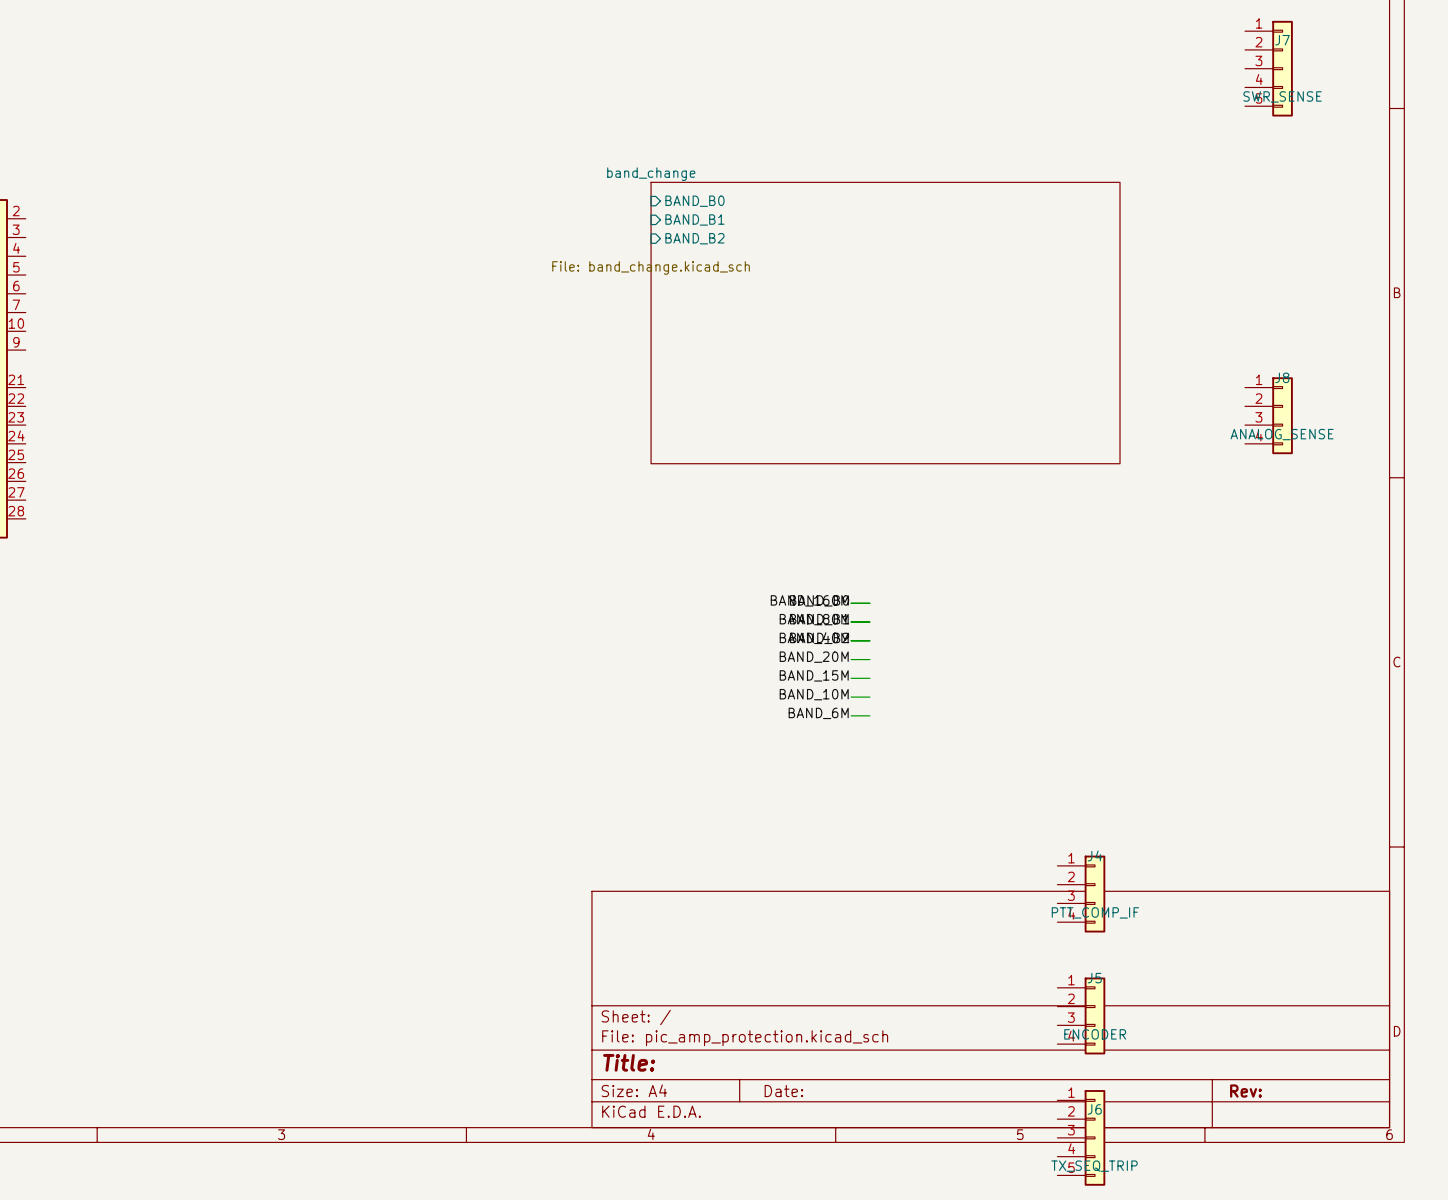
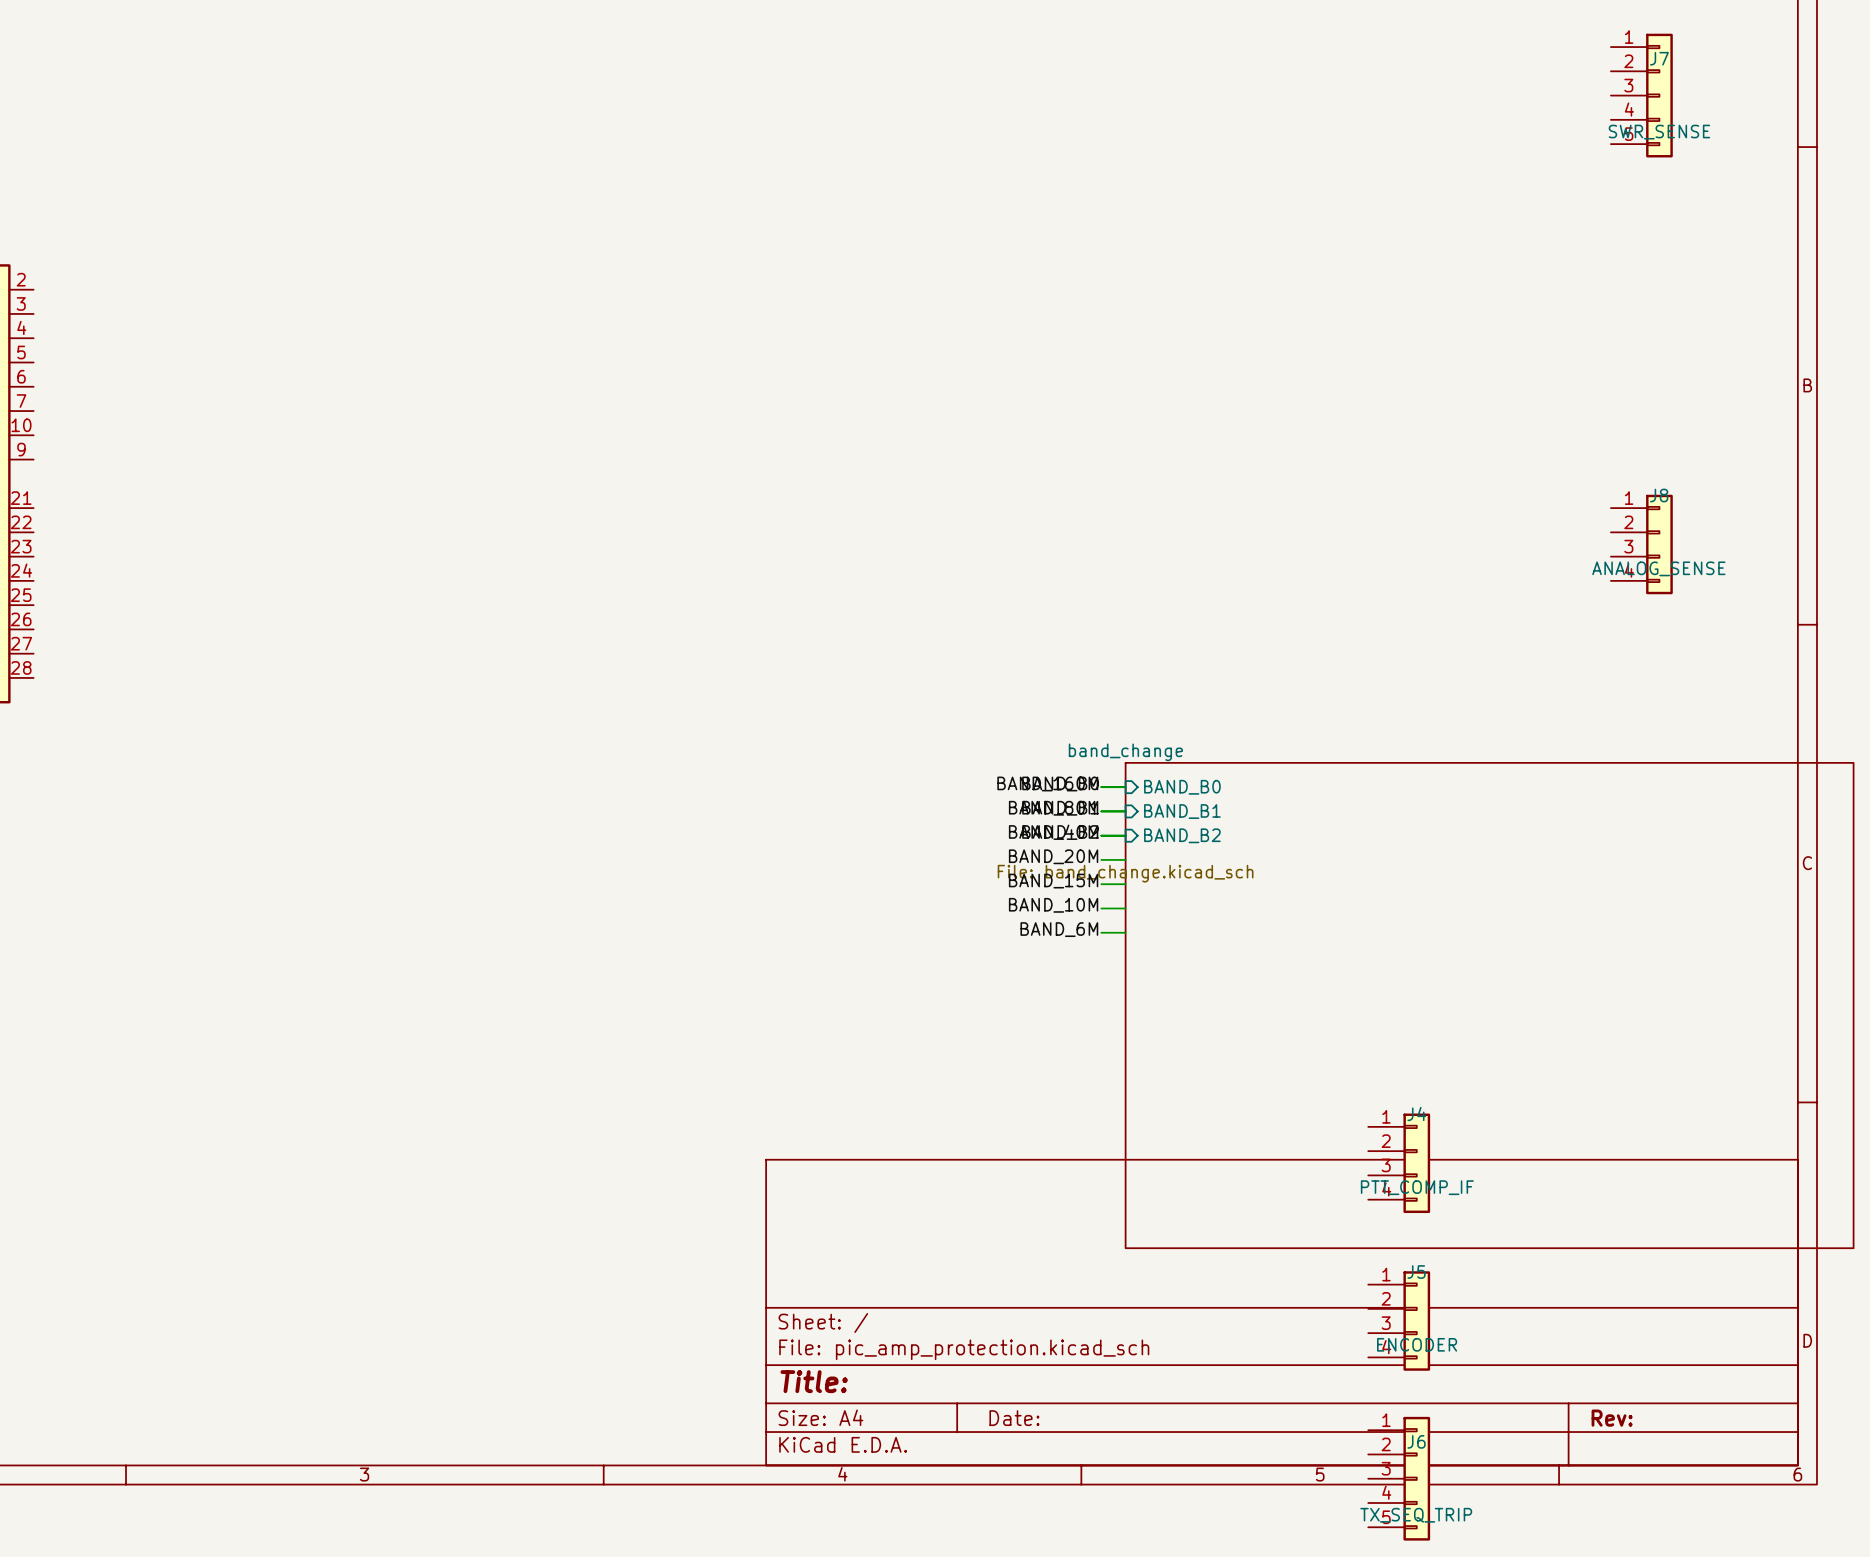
sheet pin: BAND_B0 (694, 201) -> none
sheet pin: BAND_B1 (694, 219) -> none
sheet pin: BAND_B2 (694, 238) -> none
sheet band_change: File: band_change.kicad_sch (885, 323) -> none
sheet pin: none -> BAND_B0 (1182, 787)
sheet pin: none -> BAND_B1 (1182, 811)
sheet pin: none -> BAND_B2 (1182, 835)
sheet band_change: none -> File: band_change.kicad_sch (1489, 1005)

